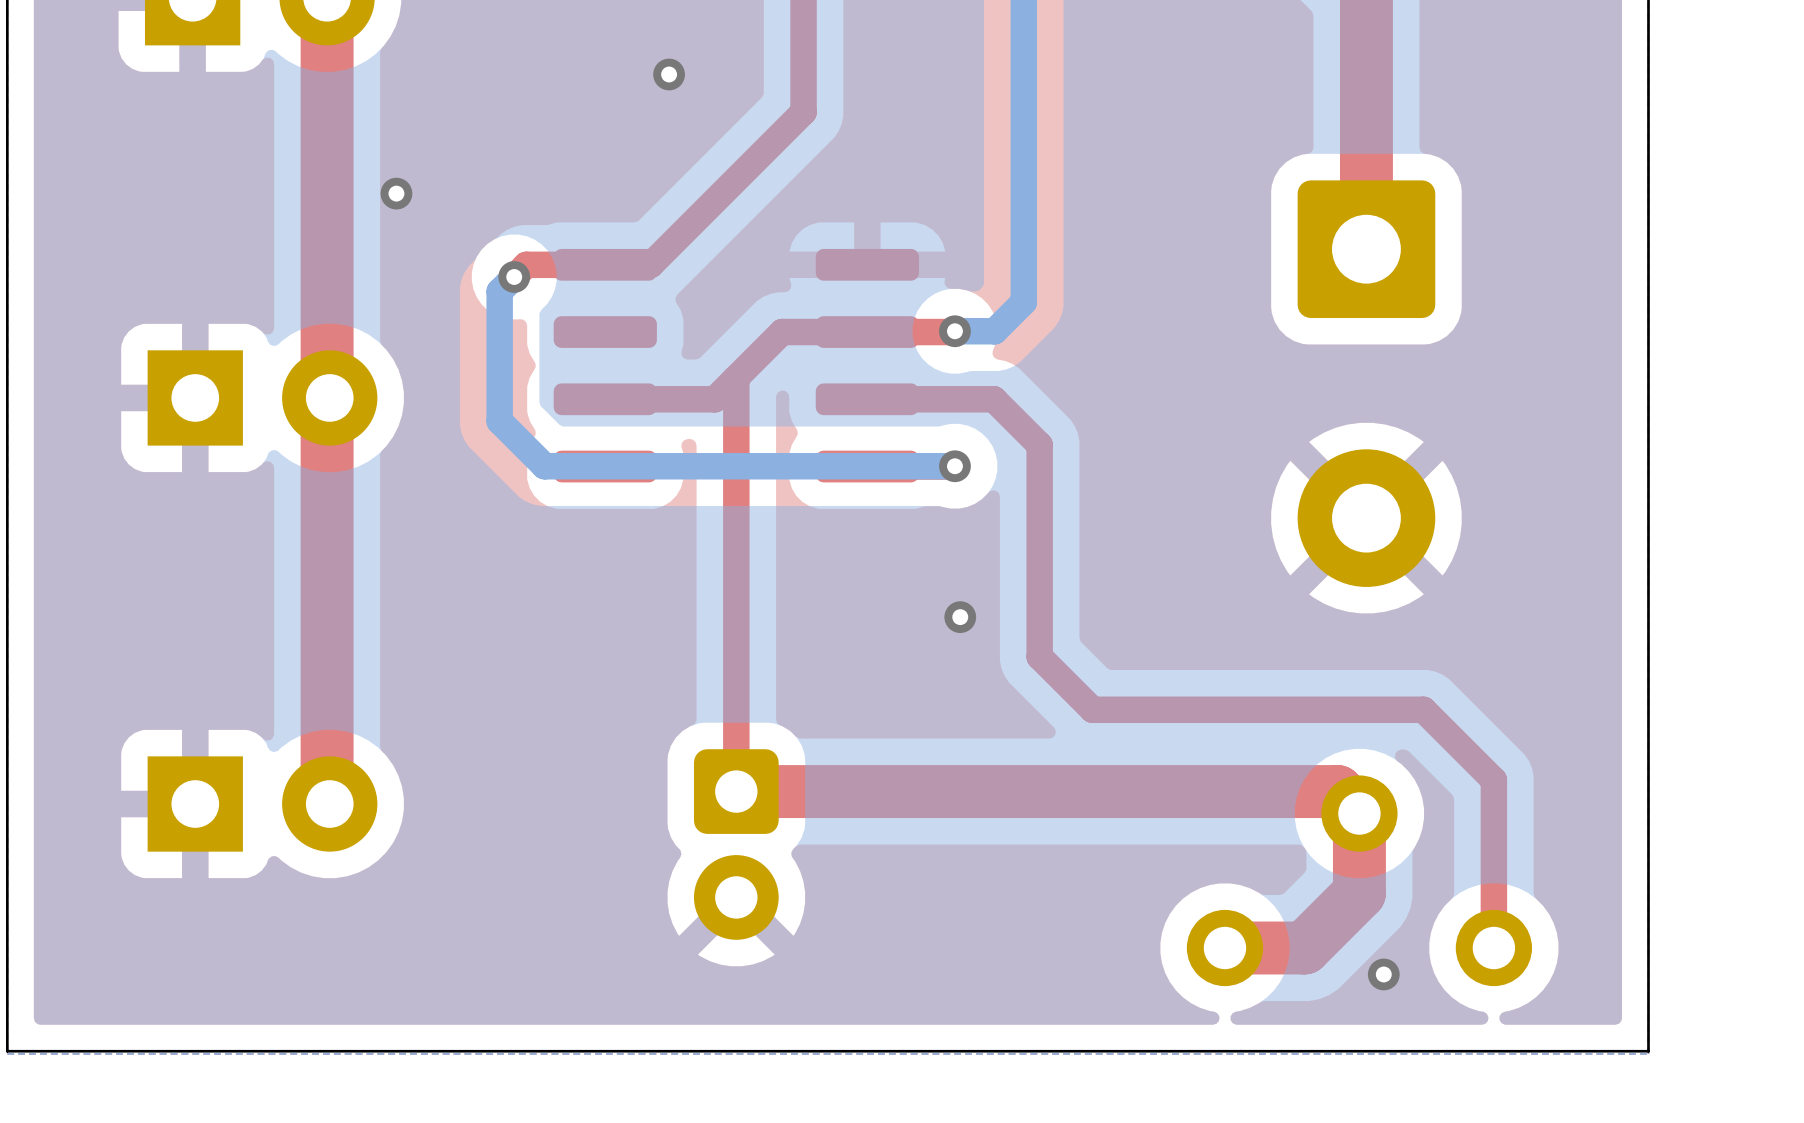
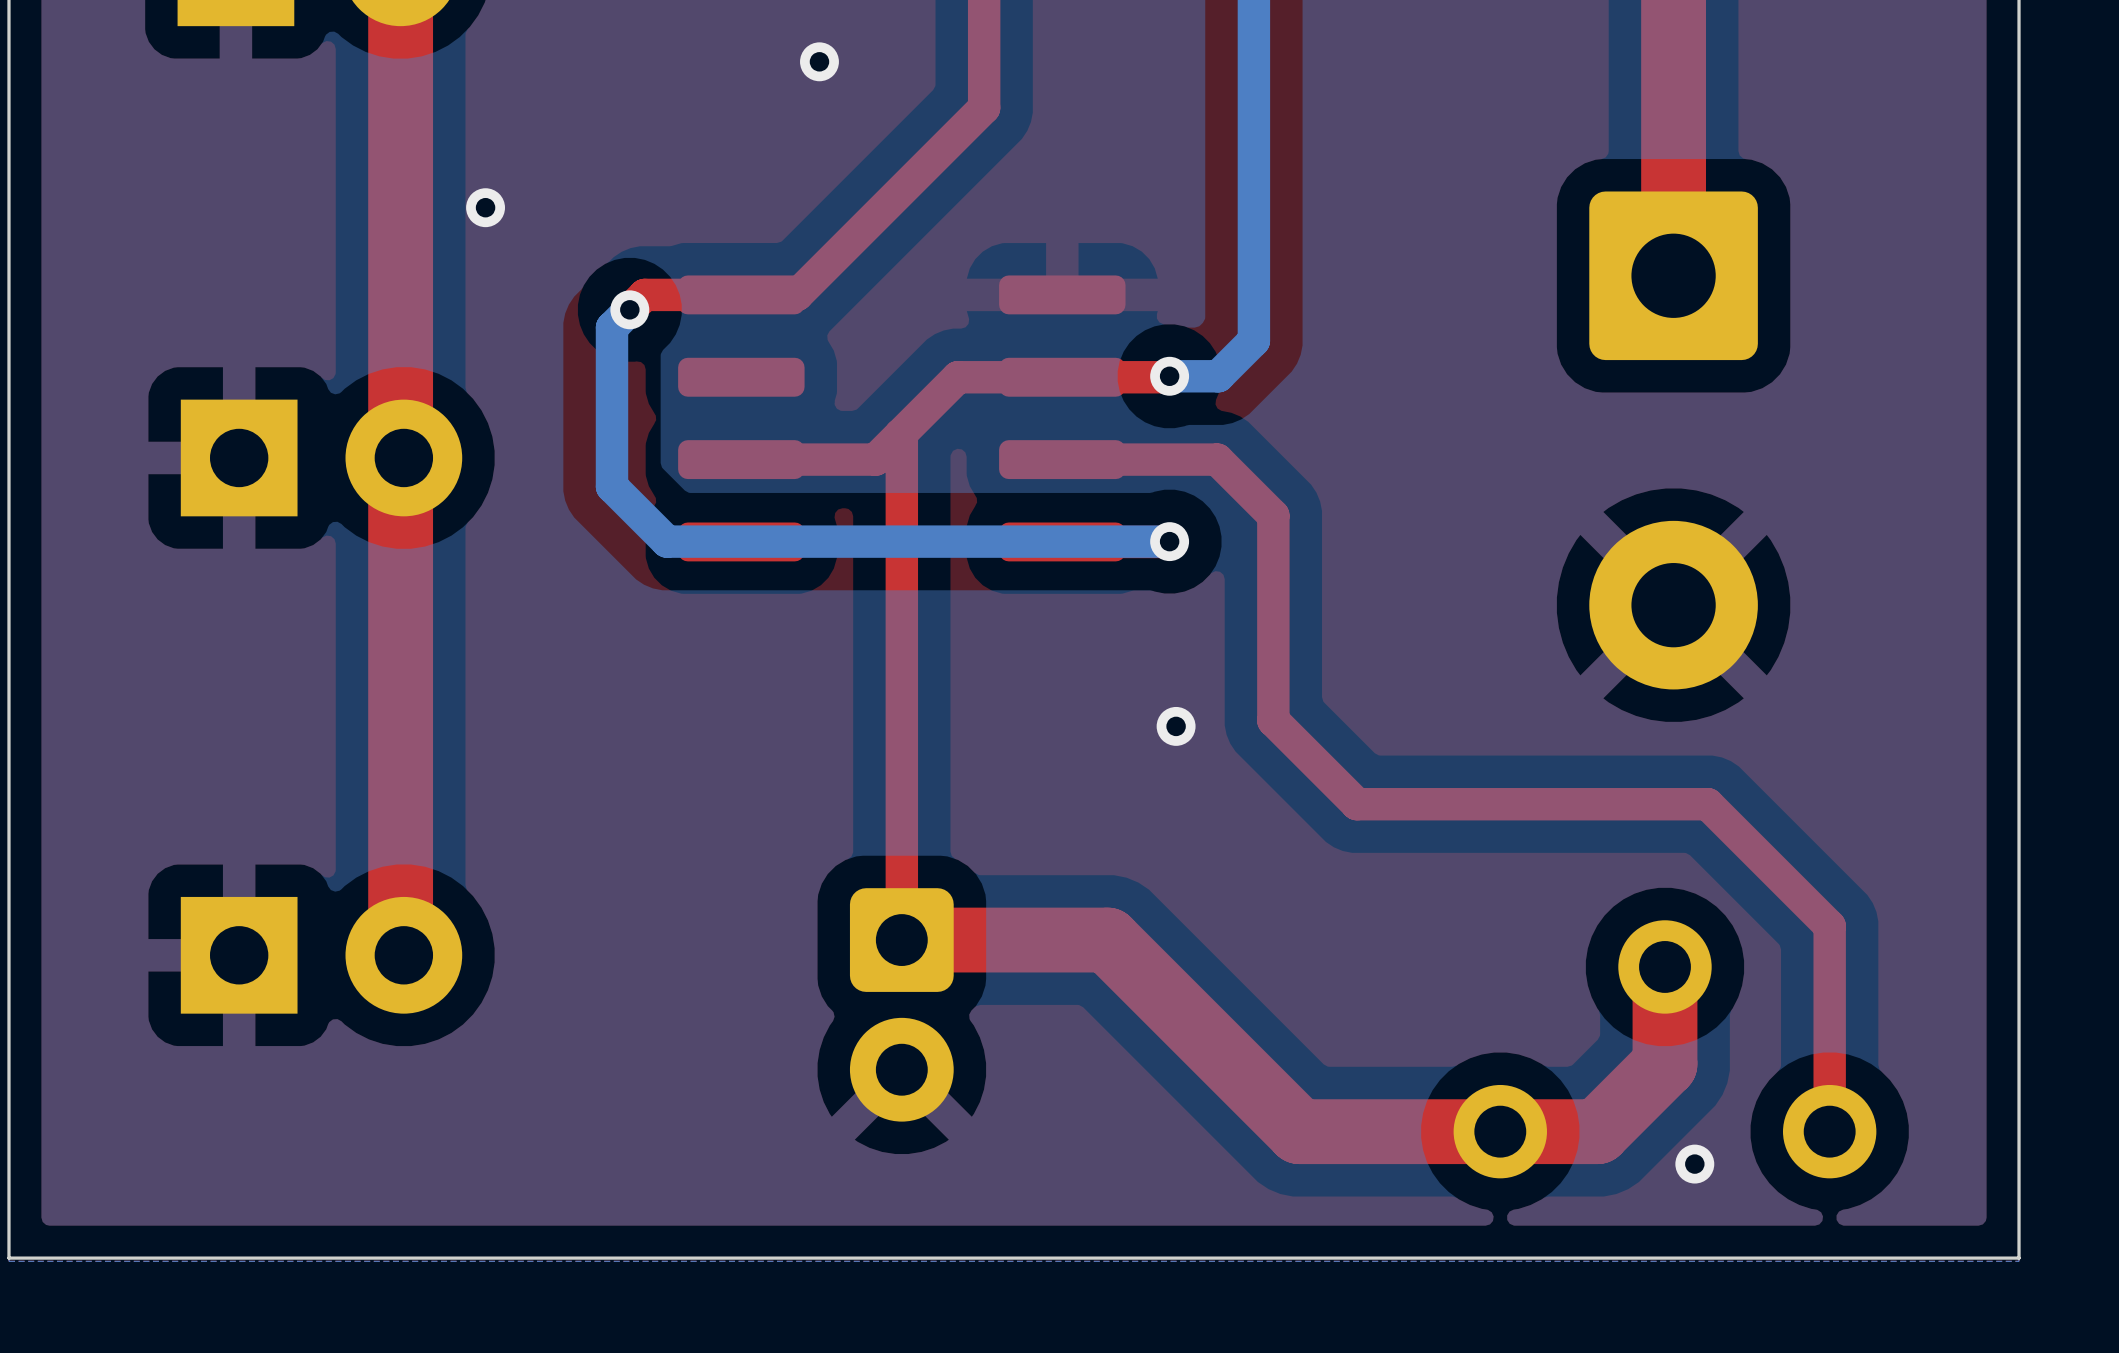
top track: (1039, 612) (1039, 656) (1092, 709) (1423, 709) -> (1273, 720) (1357, 804) (1707, 804) (1743, 839)
top track: (904, 791) (1337, 791) (1359, 813) -> (1107, 940) (1299, 1131) (1500, 1131)

